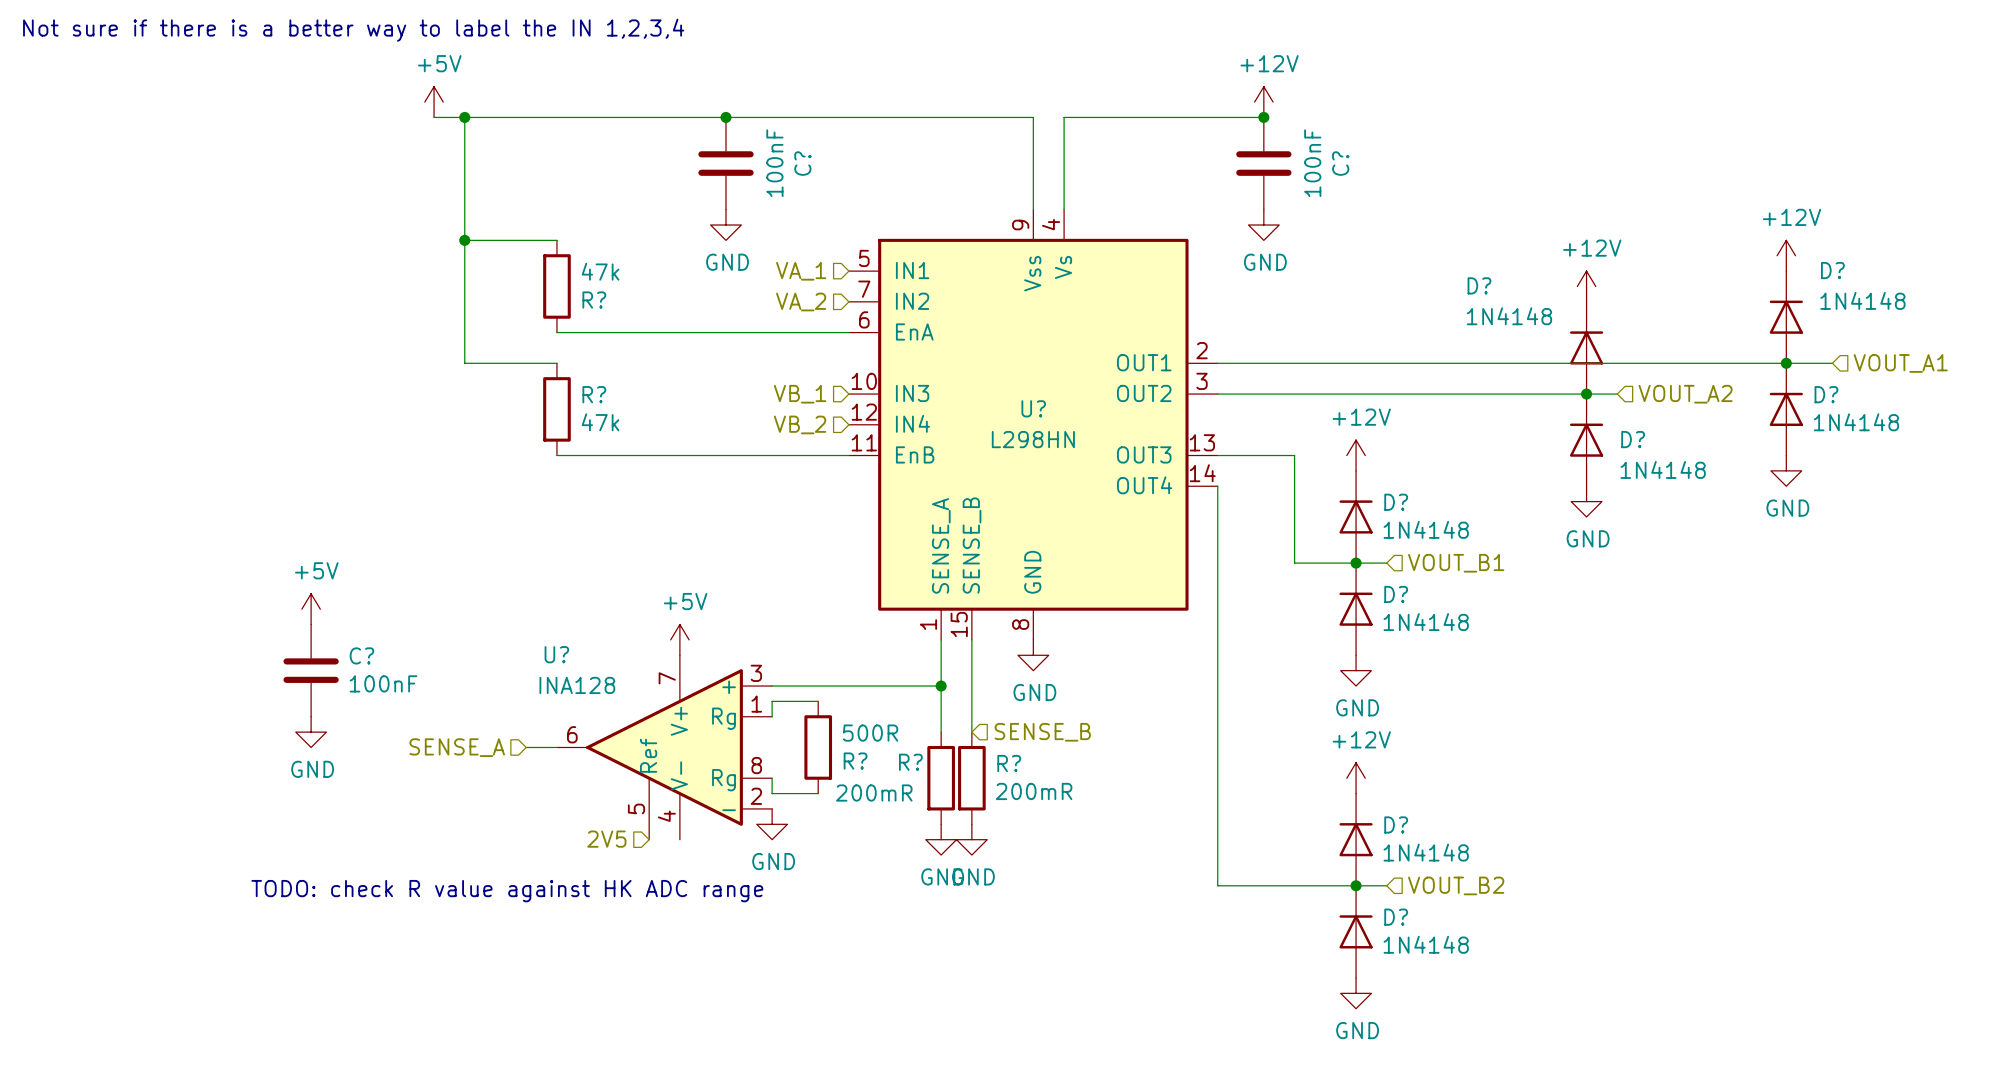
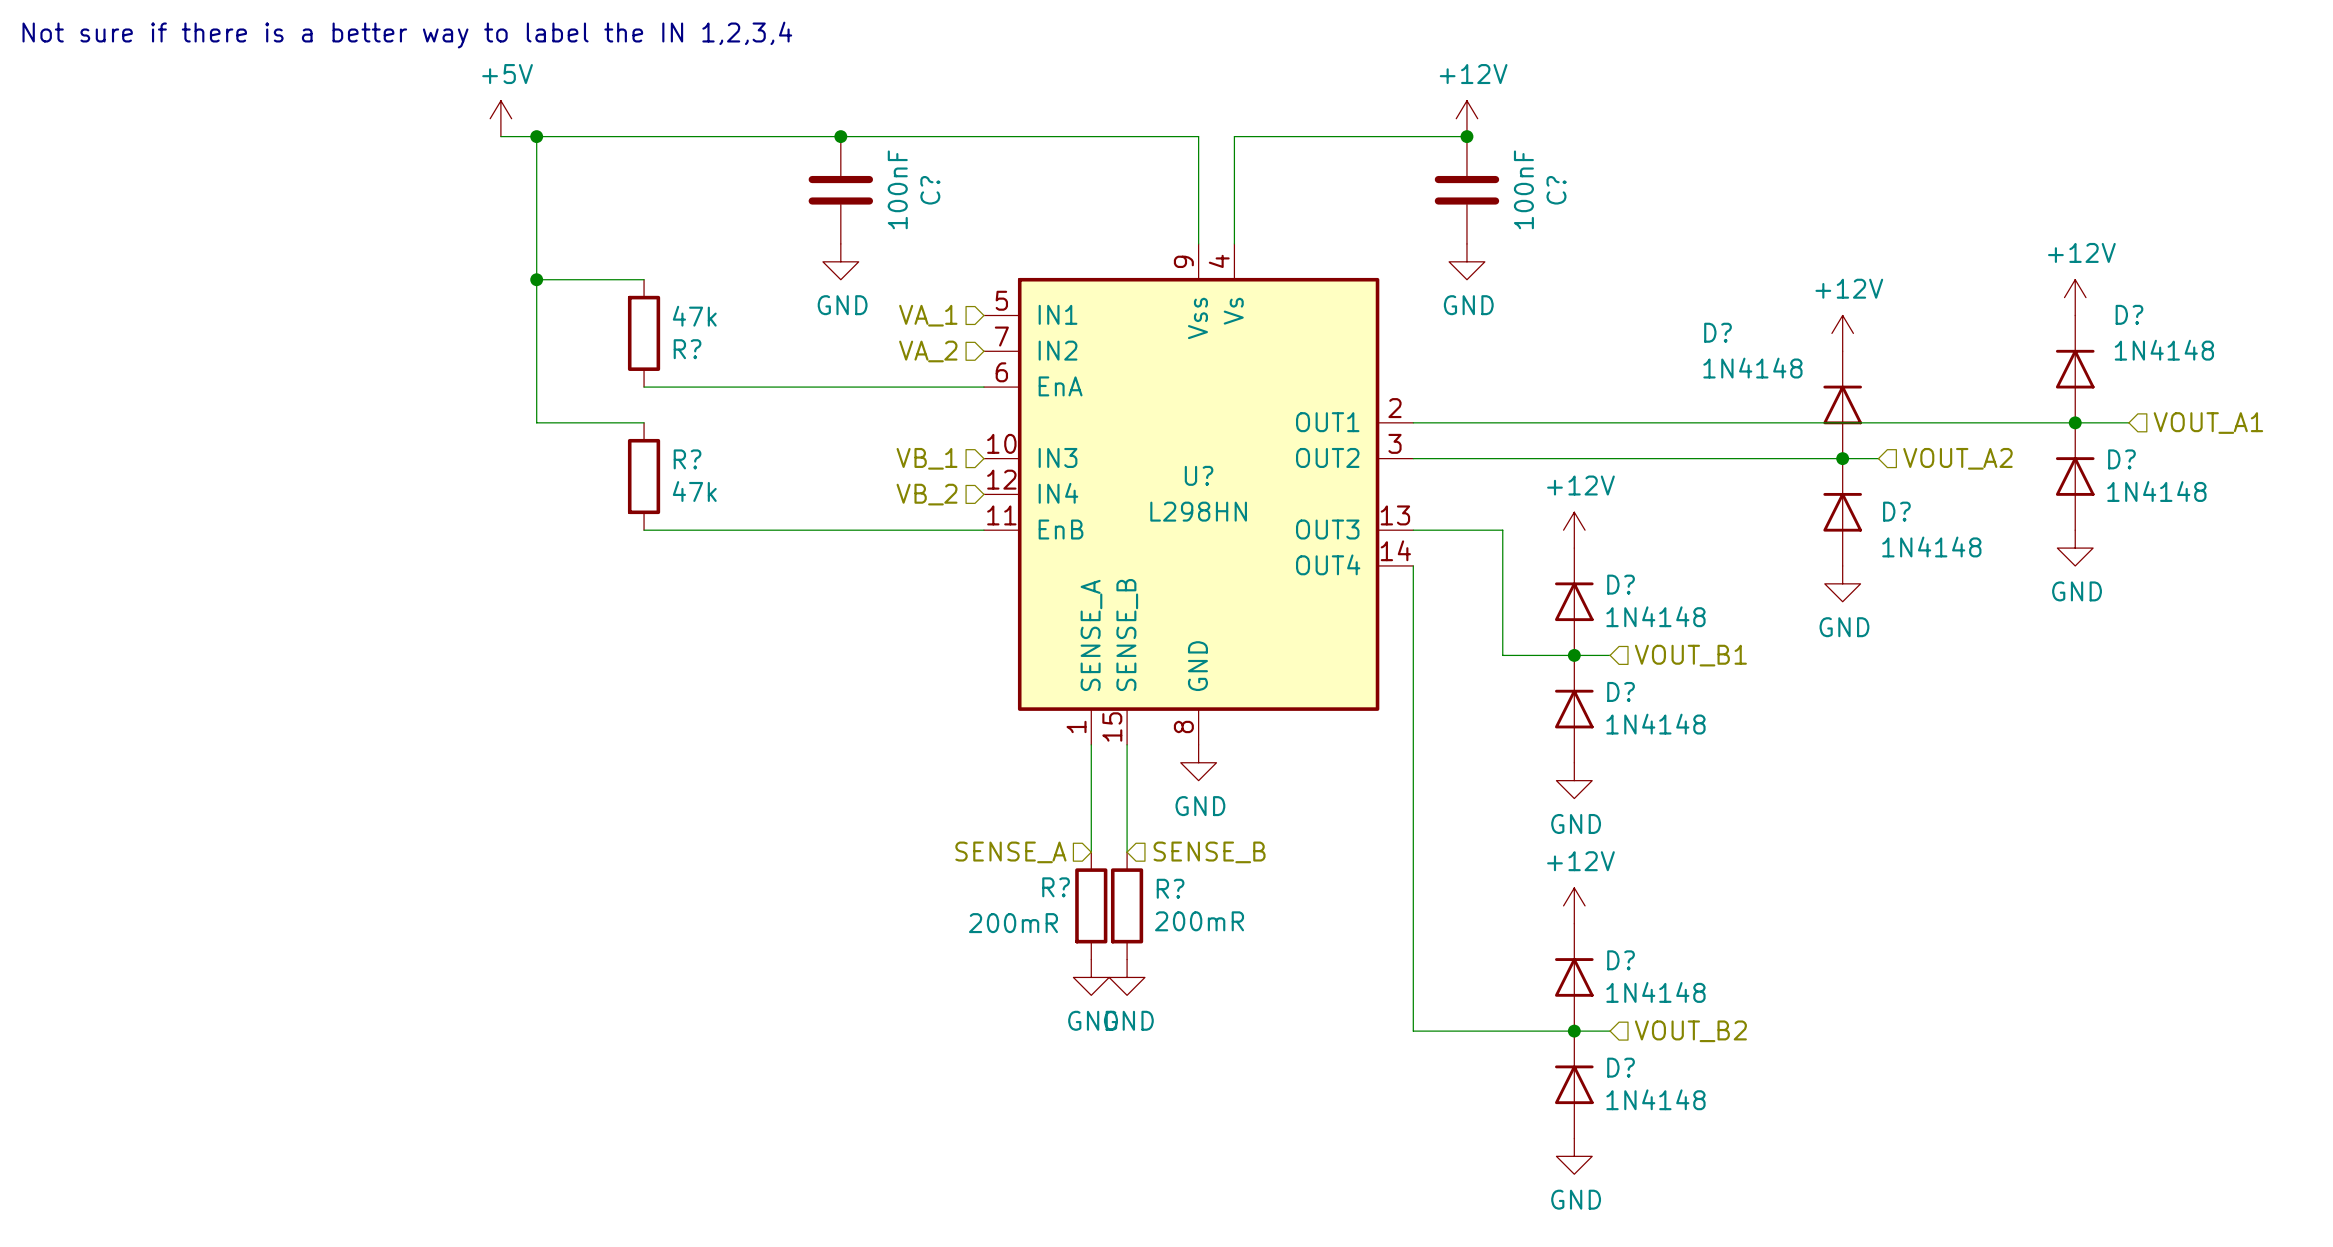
power symbol: +5V (311, 609) -> none
power symbol: +5V (679, 639) -> none
C?: 100nF (311, 670) -> none
wire: (772, 686) (941, 686) -> none
junction: (941, 686) -> none
wire: (818, 701) (772, 701) (772, 716) -> none
power symbol: GND (311, 732) -> none
hierarchical label: none -> SENSE_A (1010, 852)
hierarchical label: SENSE_A (457, 747) -> none
wire: (526, 747) (556, 747) -> none
U?: INA128 (664, 747) -> none
R?: 500R (818, 747) -> none
wire: (772, 778) (772, 793) (818, 793) -> none
power symbol: GND (772, 824) -> none
hierarchical label: 2V5 (606, 839) -> none
text: TODO: check R value against HK ADC range (507, 891) -> none

